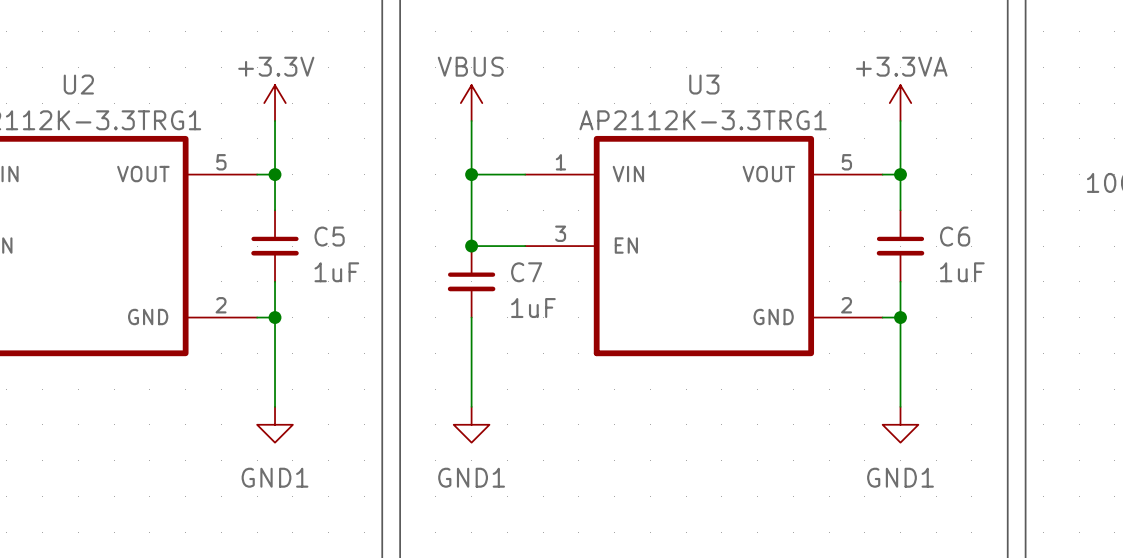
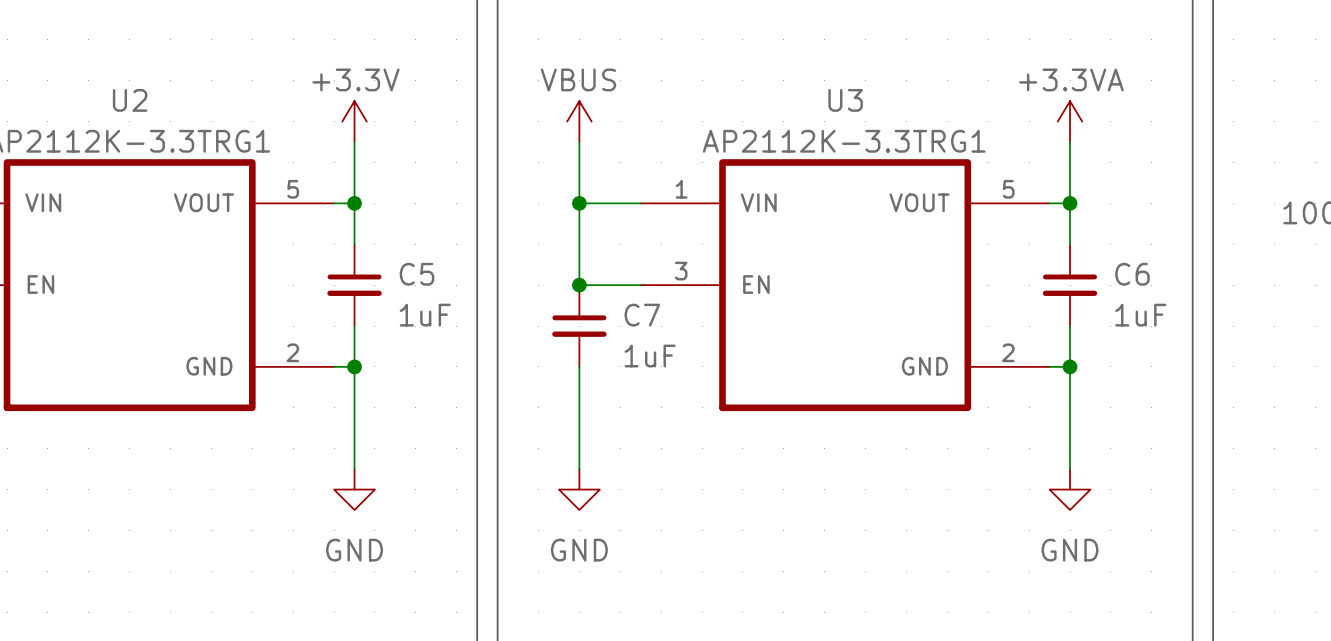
power symbol: GND1 (275, 424) -> GND (354, 489)
power symbol: GND1 (471, 424) -> GND (579, 489)
power symbol: GND1 (900, 424) -> GND (1070, 489)

